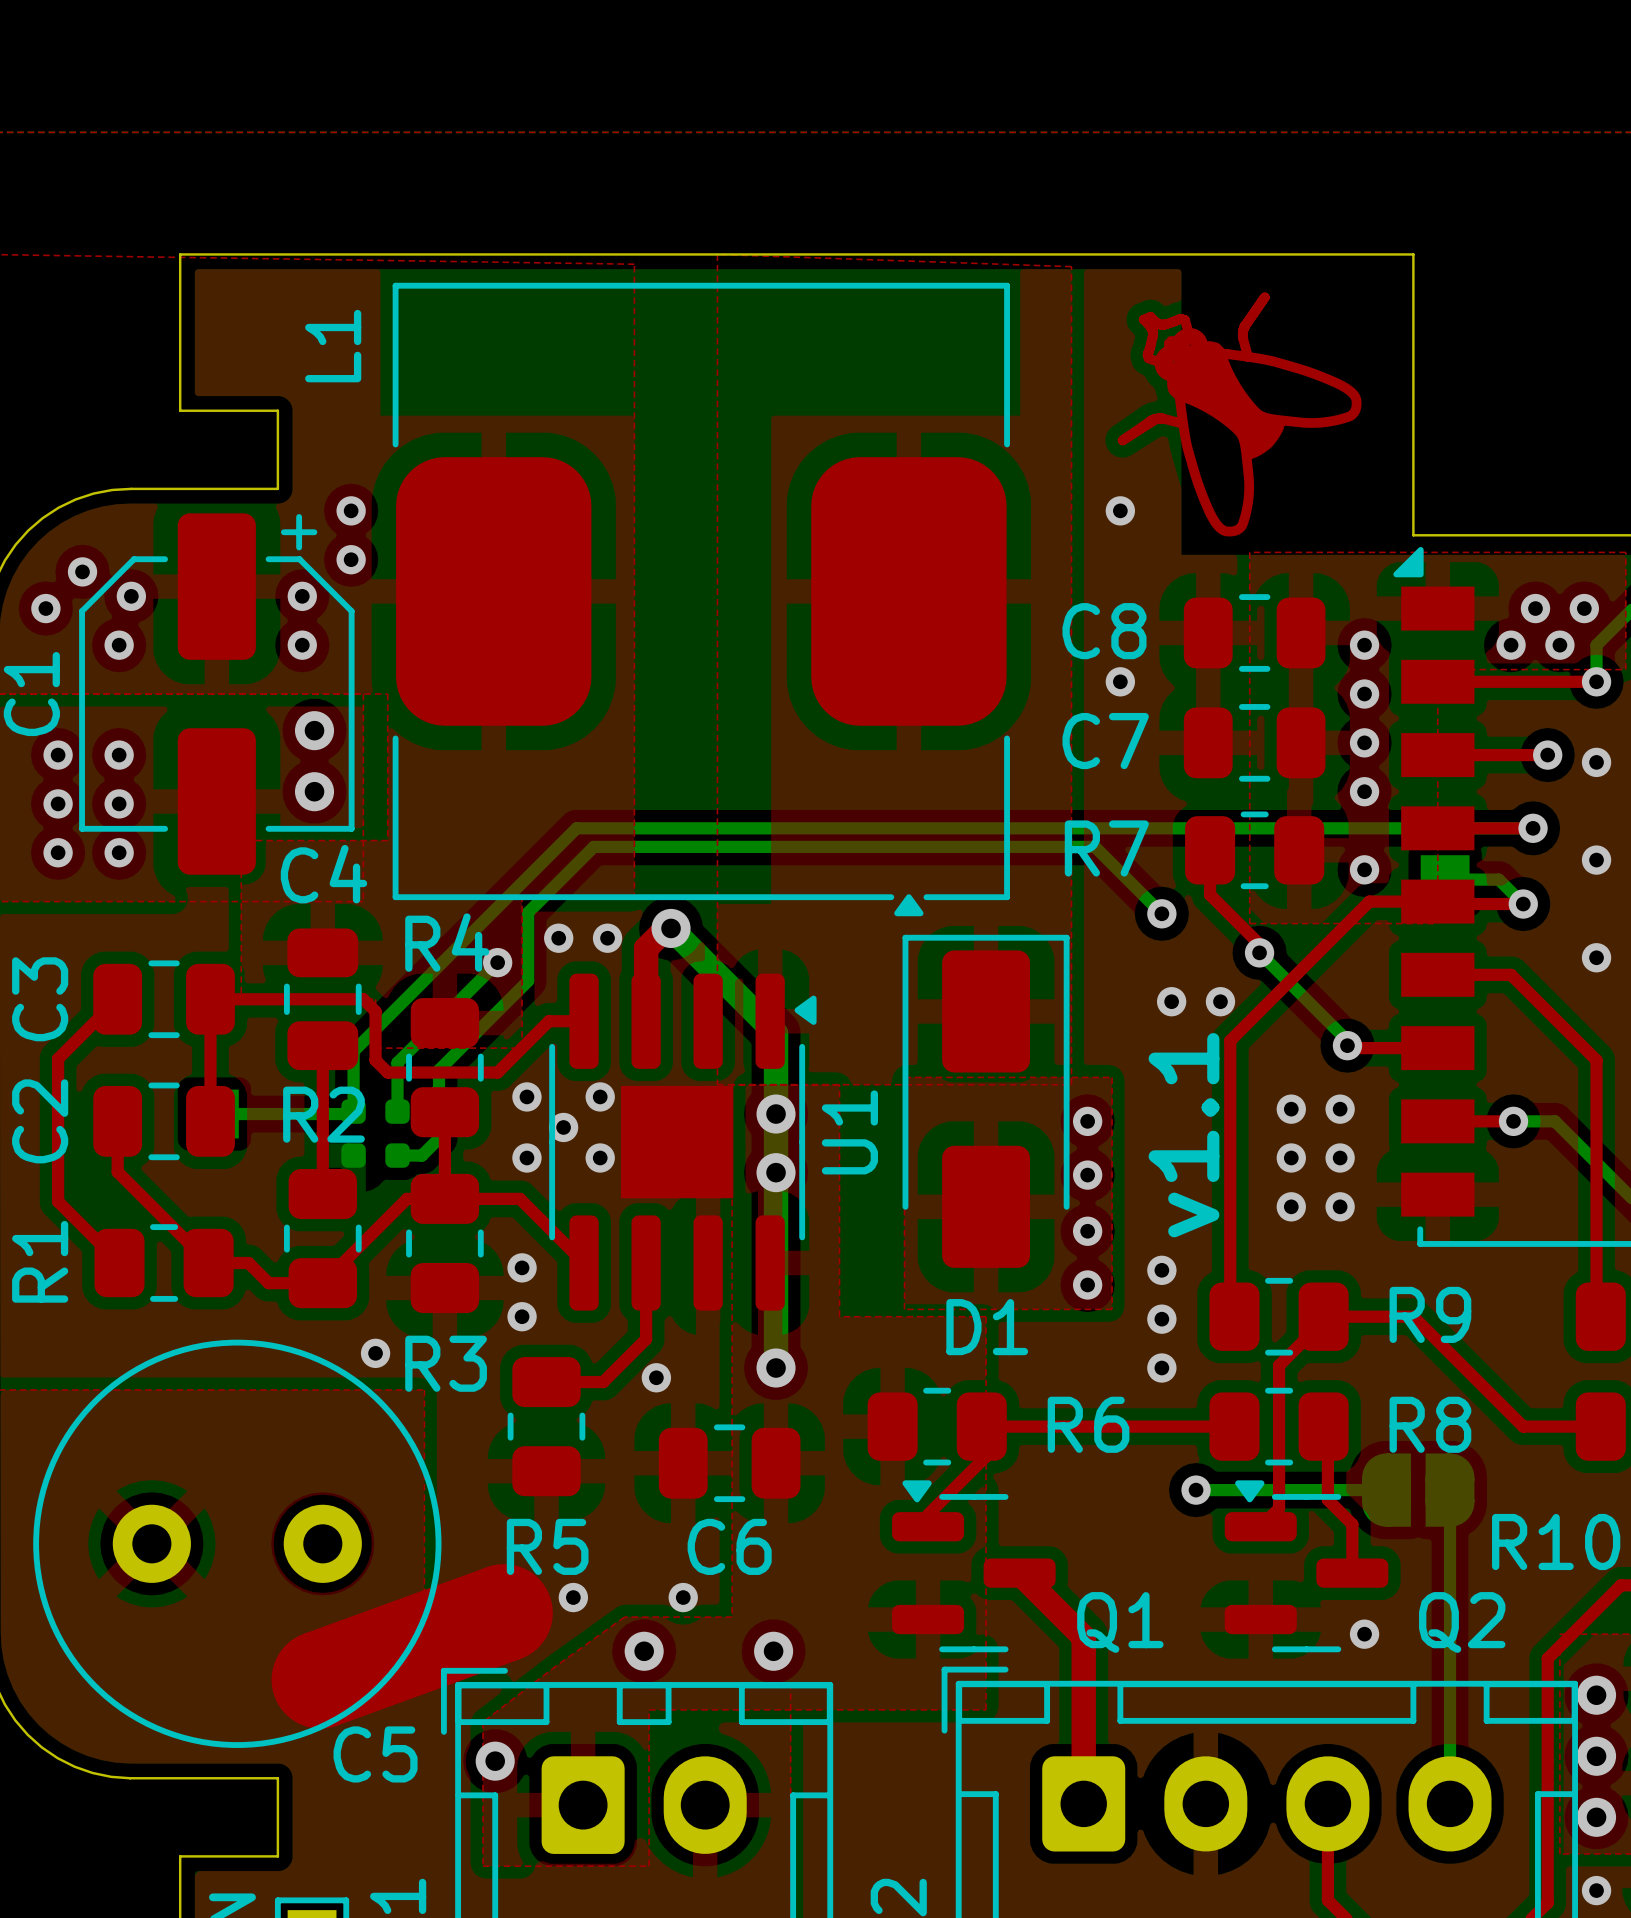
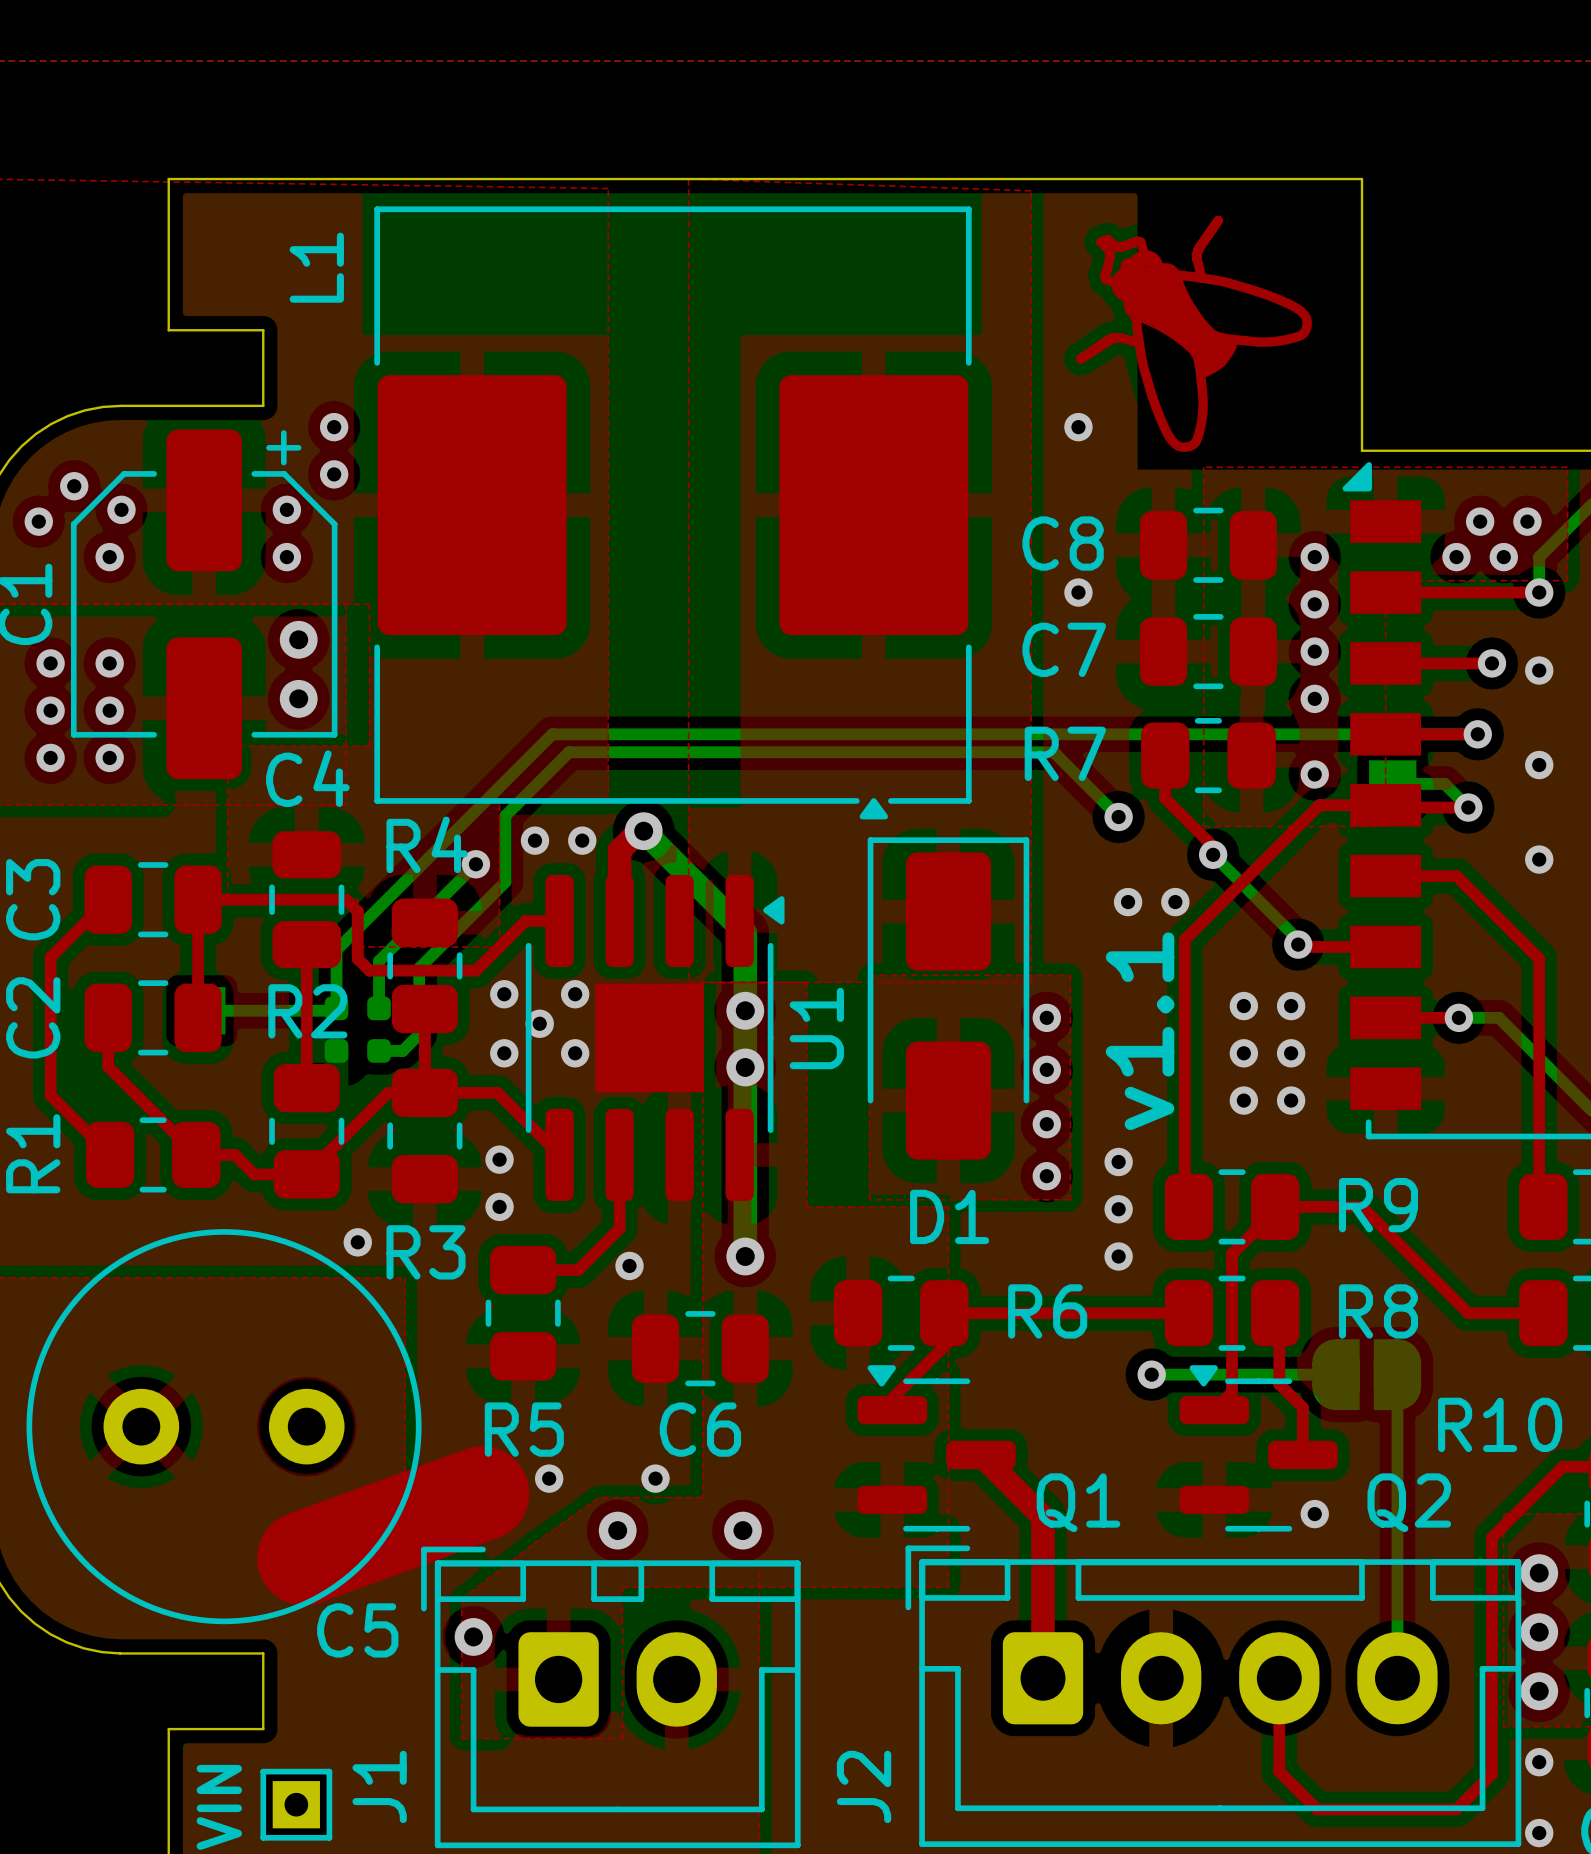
L1 footprint: [392, 282, 1010, 917] -> [374, 206, 972, 820]

